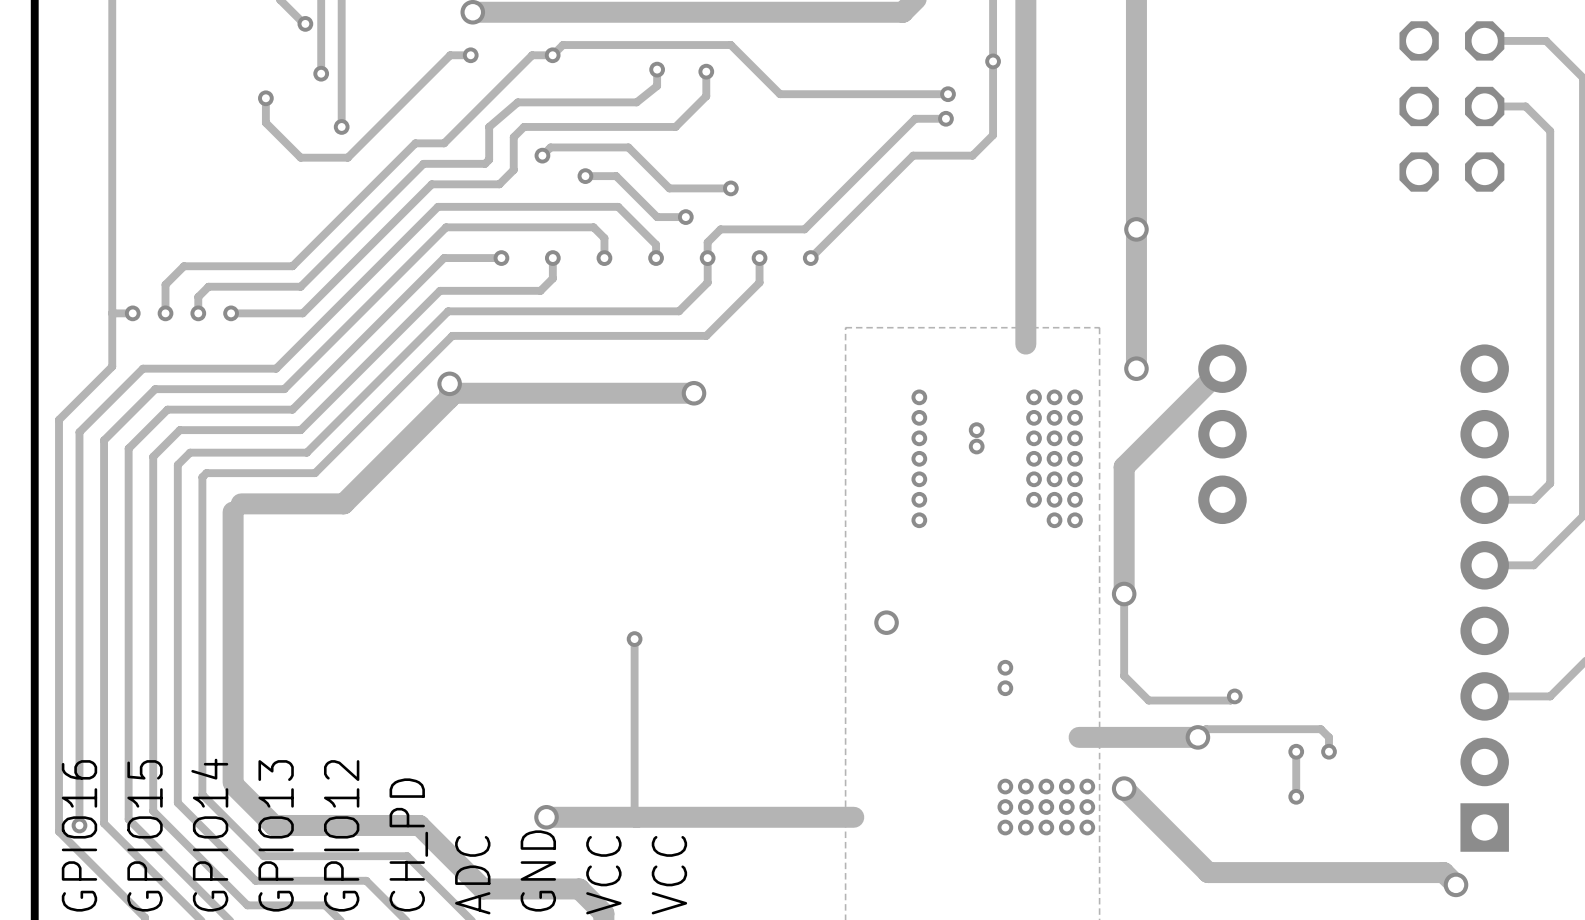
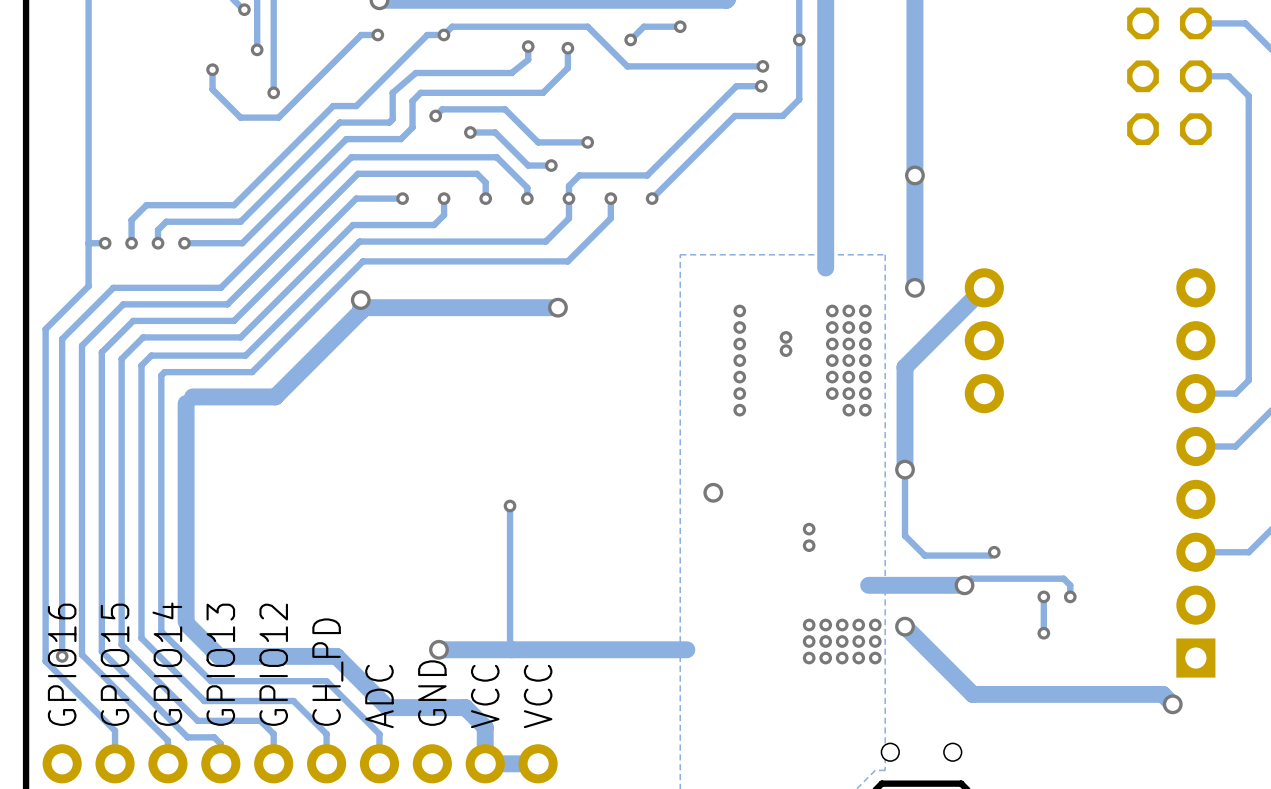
track: none -> (680, 26) (643, 26) (630, 39)
via: none -> (680, 26)
via: none -> (630, 39)

